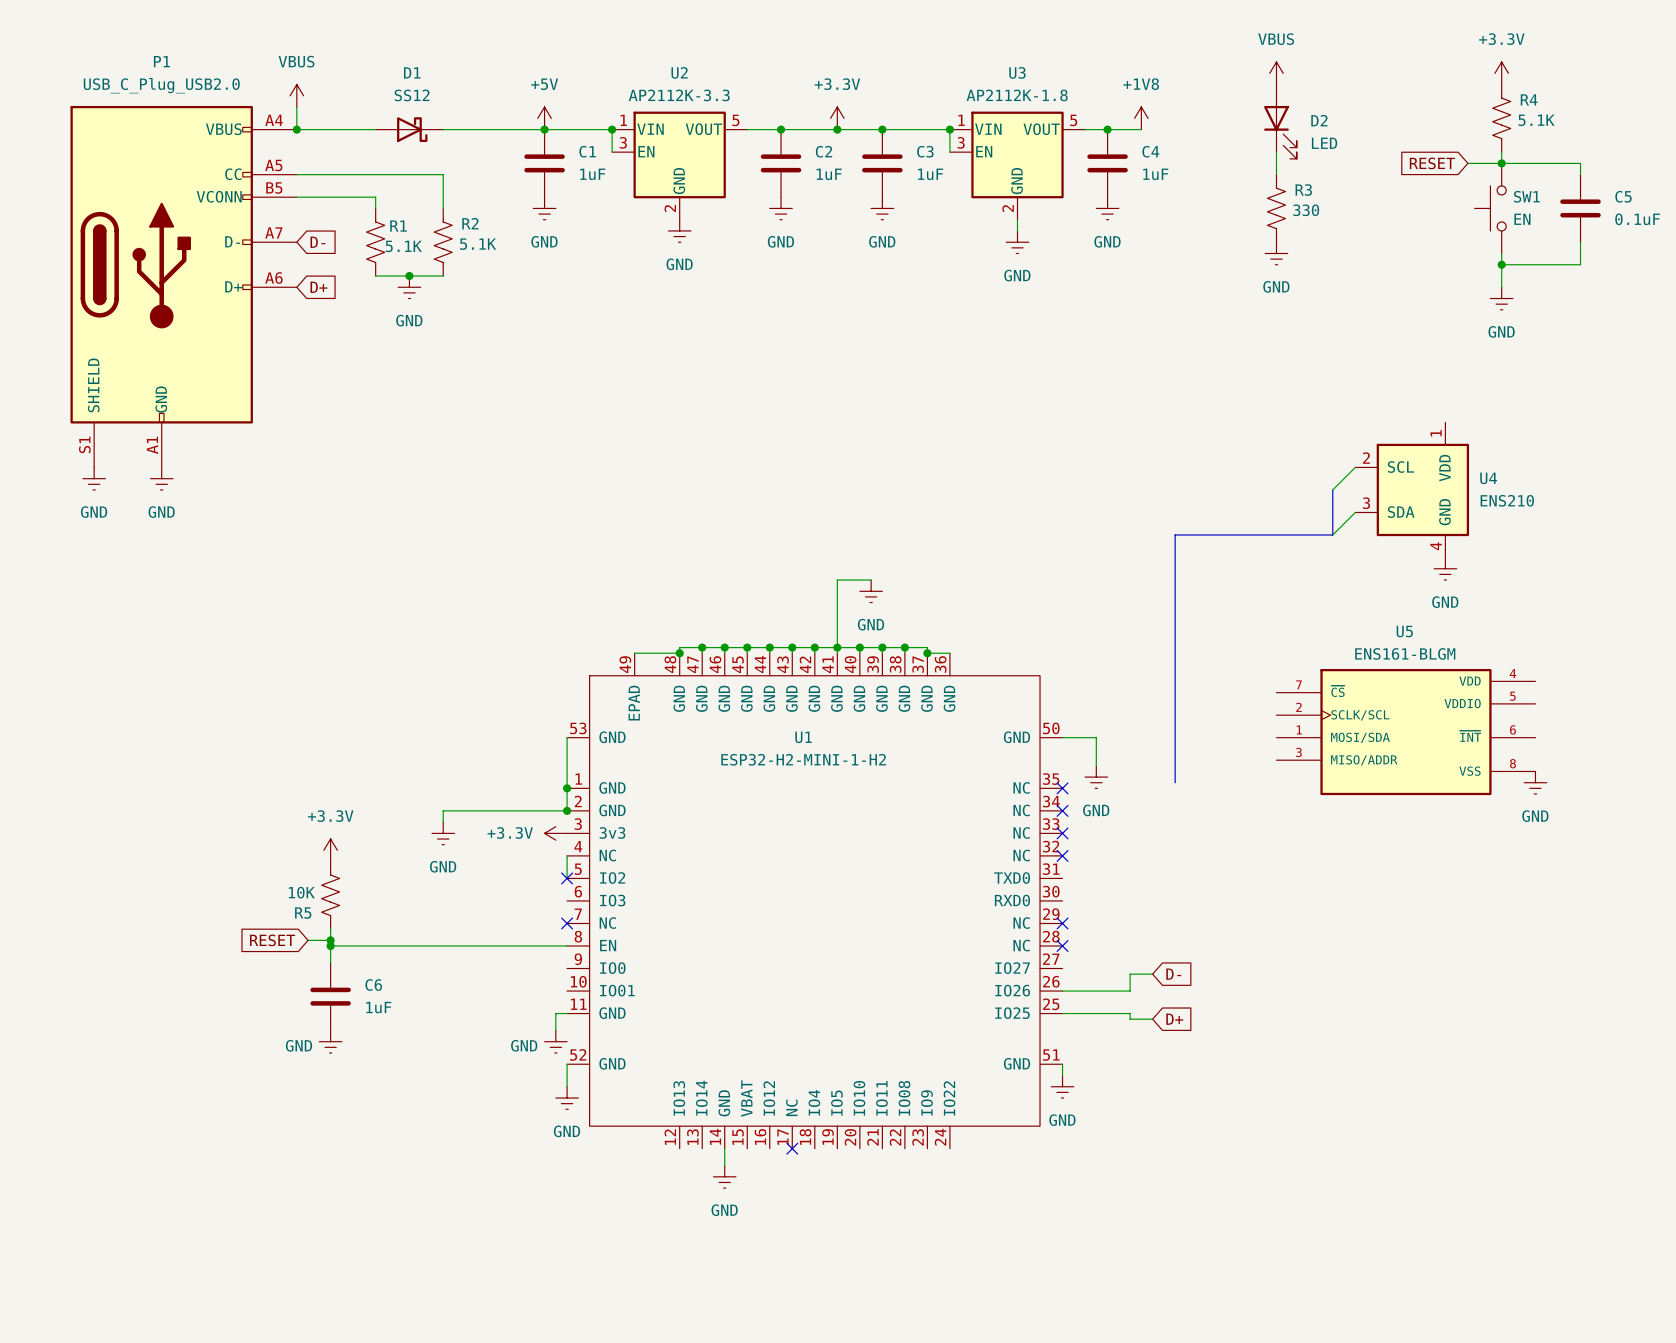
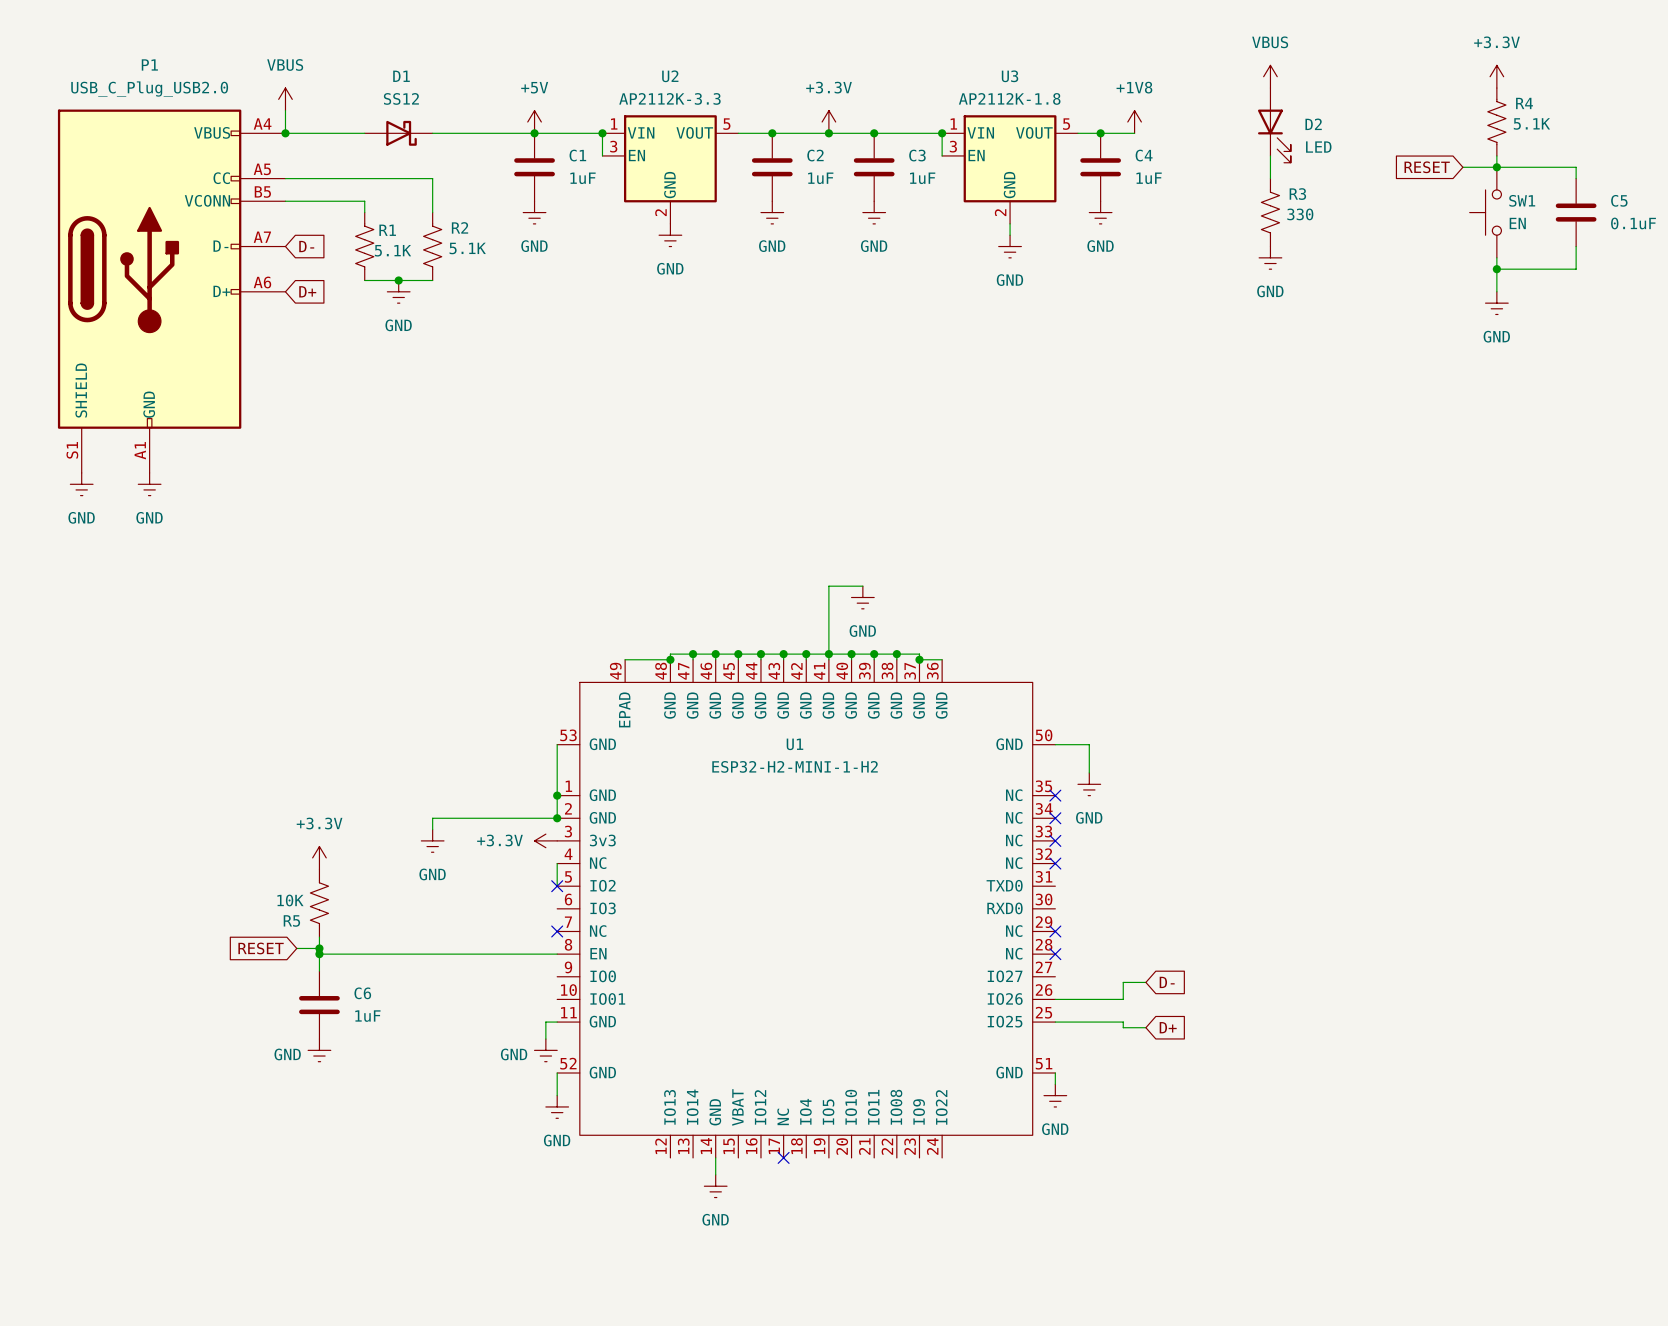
wire: (1355, 467) (1332, 489) -> none
bus: (1332, 489) (1332, 534) (1175, 534) (1175, 782) -> none
U4: ENS210 (1412, 489) -> none
wire: (1355, 512) (1332, 534) -> none
power symbol: GND (1445, 568) -> none
U5: ENS161-BLGM (1405, 732) -> none
power symbol: GND (1535, 782) -> none

